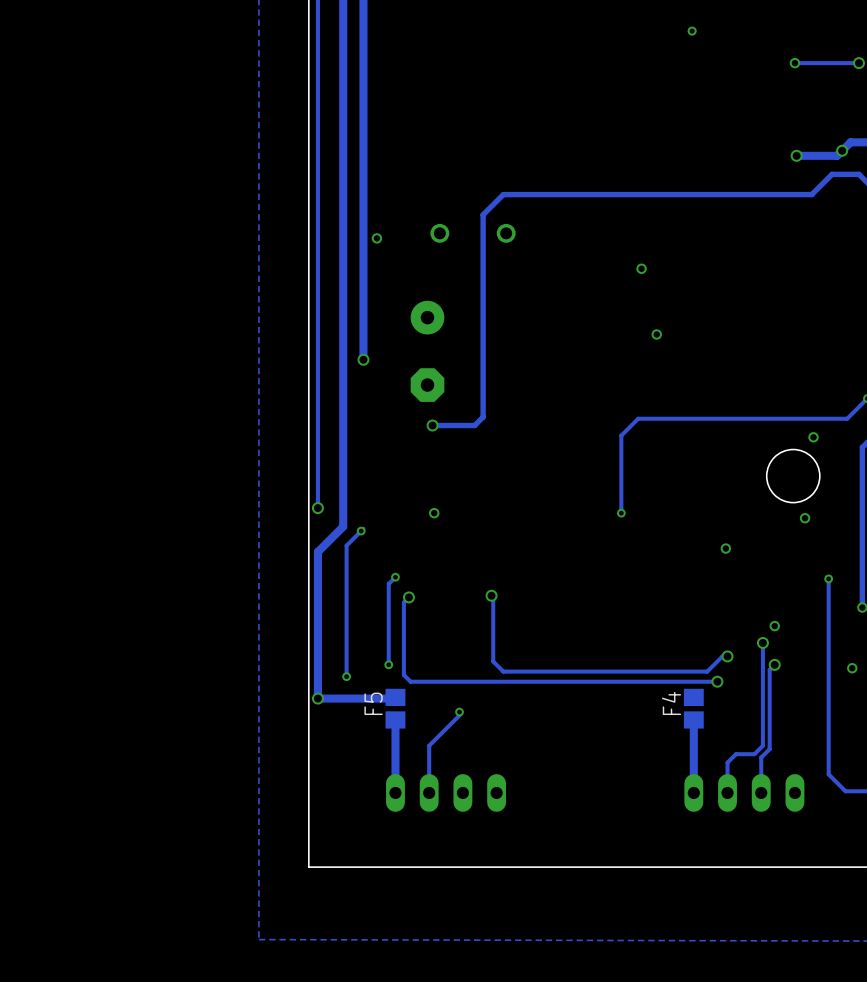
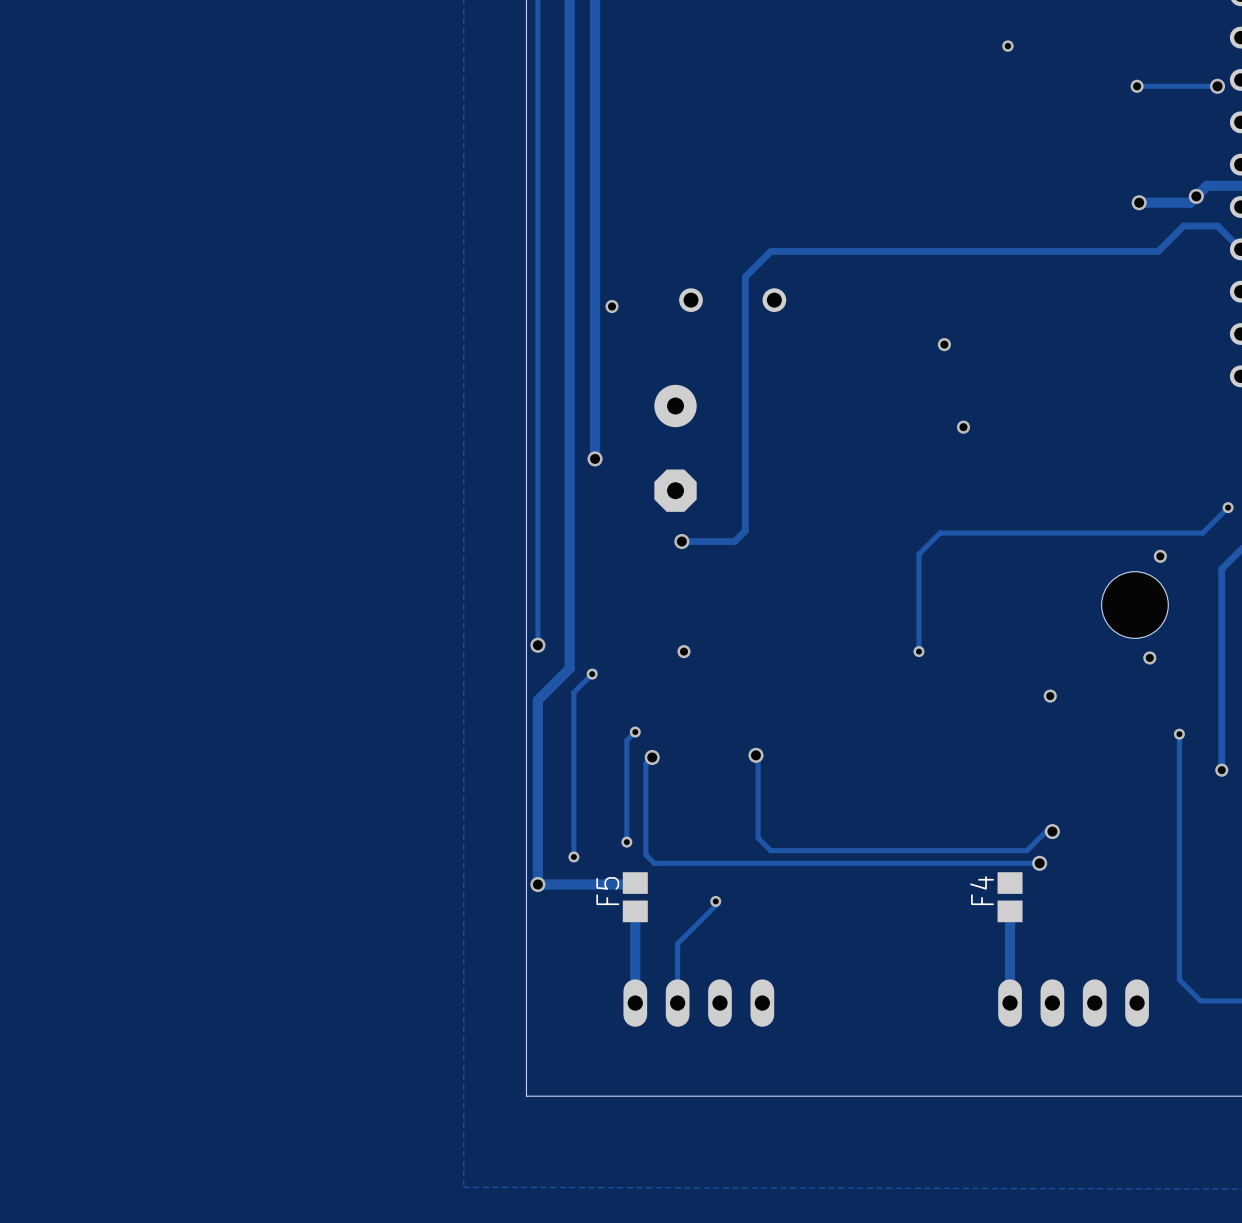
via: (774, 626) -> none
track: (762, 642) (762, 745) (754, 754) (735, 754) (727, 762) (727, 792) -> none
via: (762, 642) -> none
track: (774, 664) (769, 669) (769, 749) (761, 757) (761, 792) -> none
via: (774, 664) -> none
via: (852, 668) -> none

